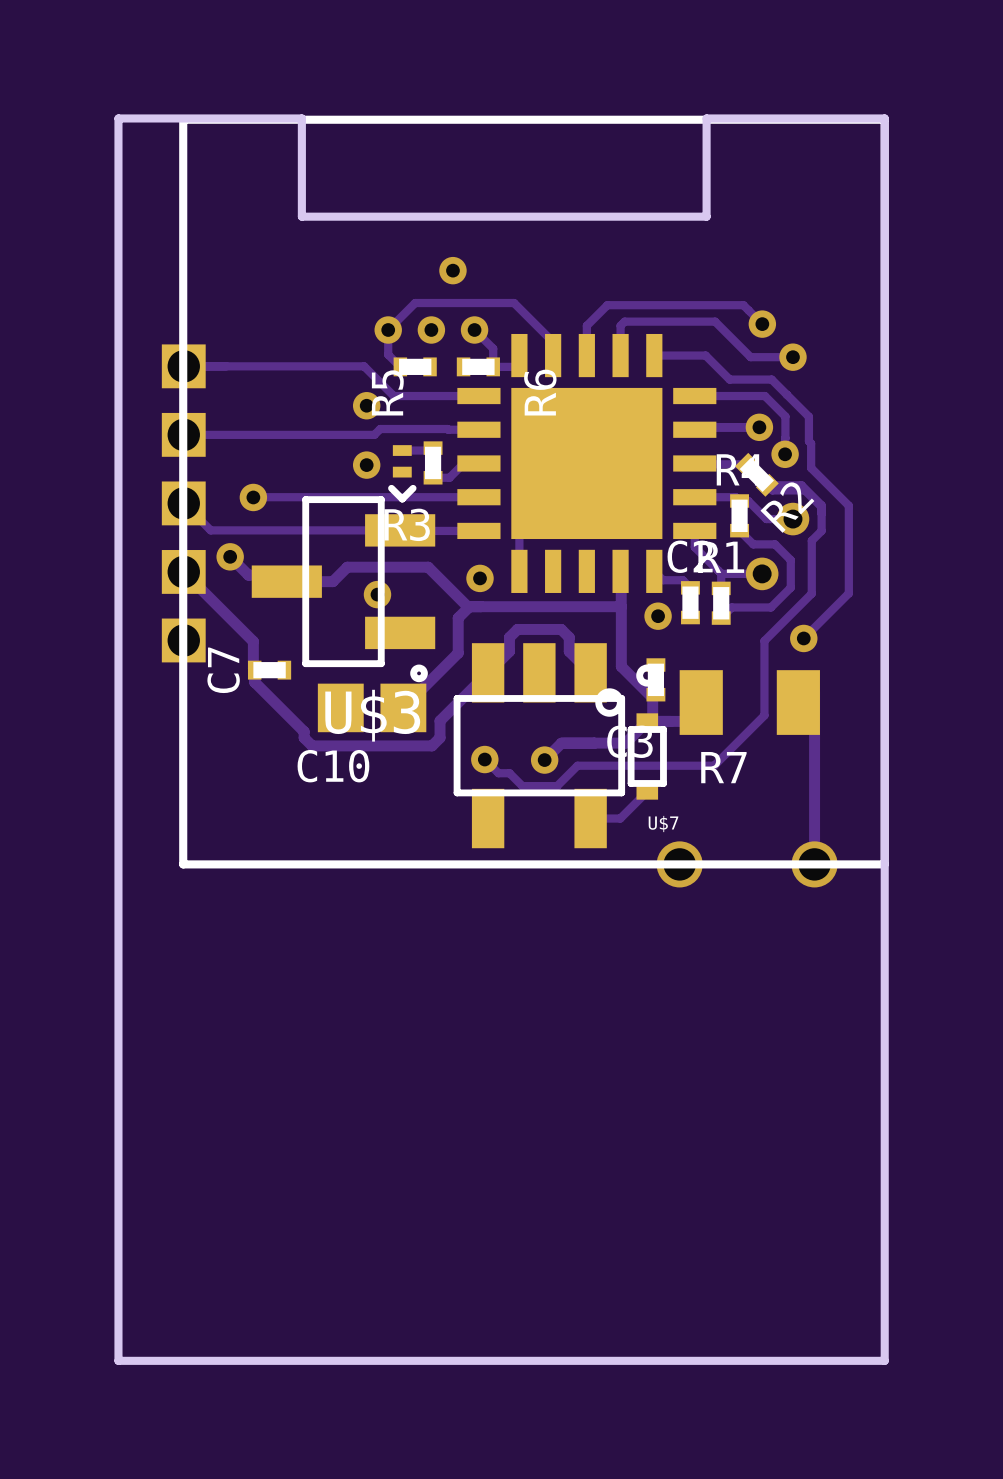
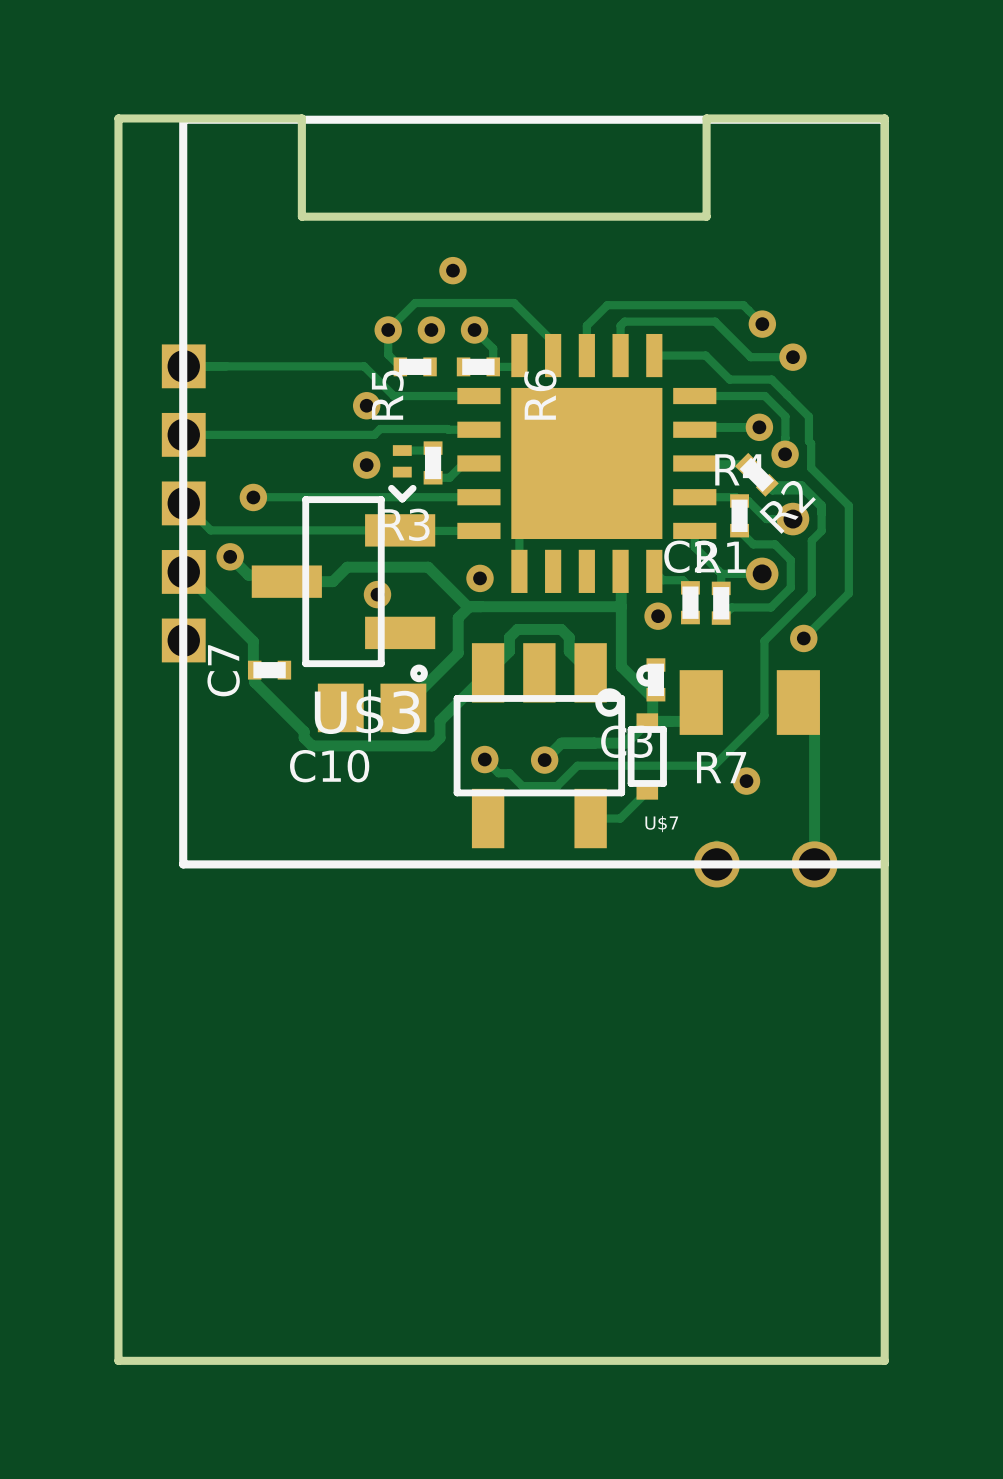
via: none -> (746, 781)
via position: (679, 864) -> (716, 864)

